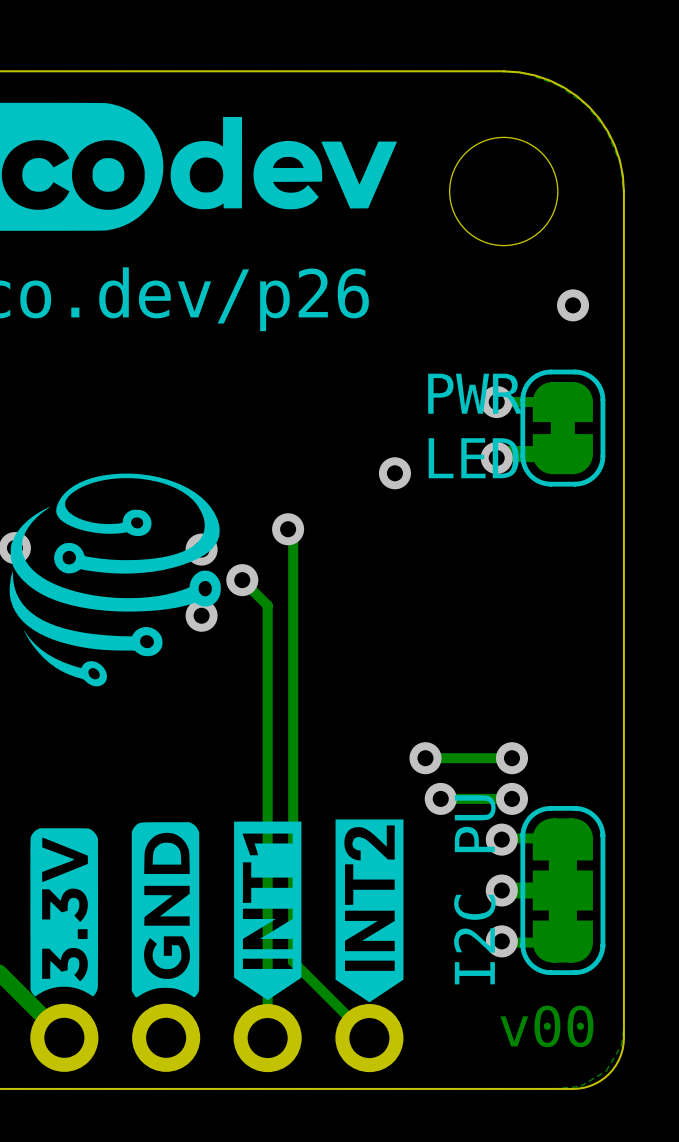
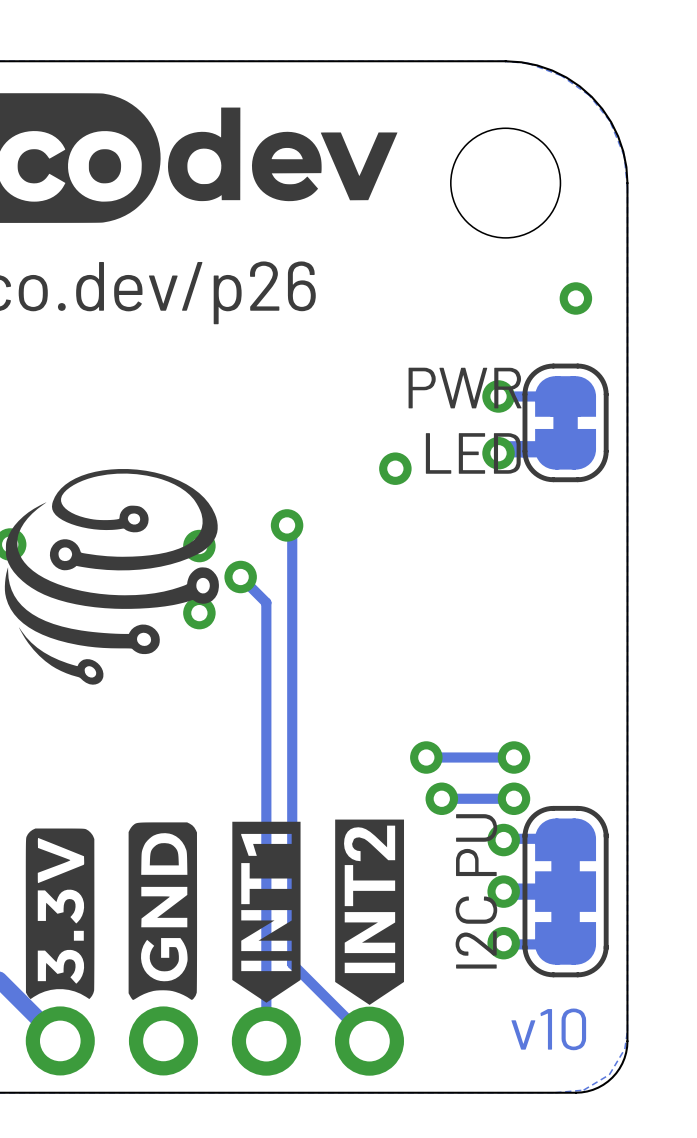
text: v00 (546, 1026) -> v10 (548, 1029)

